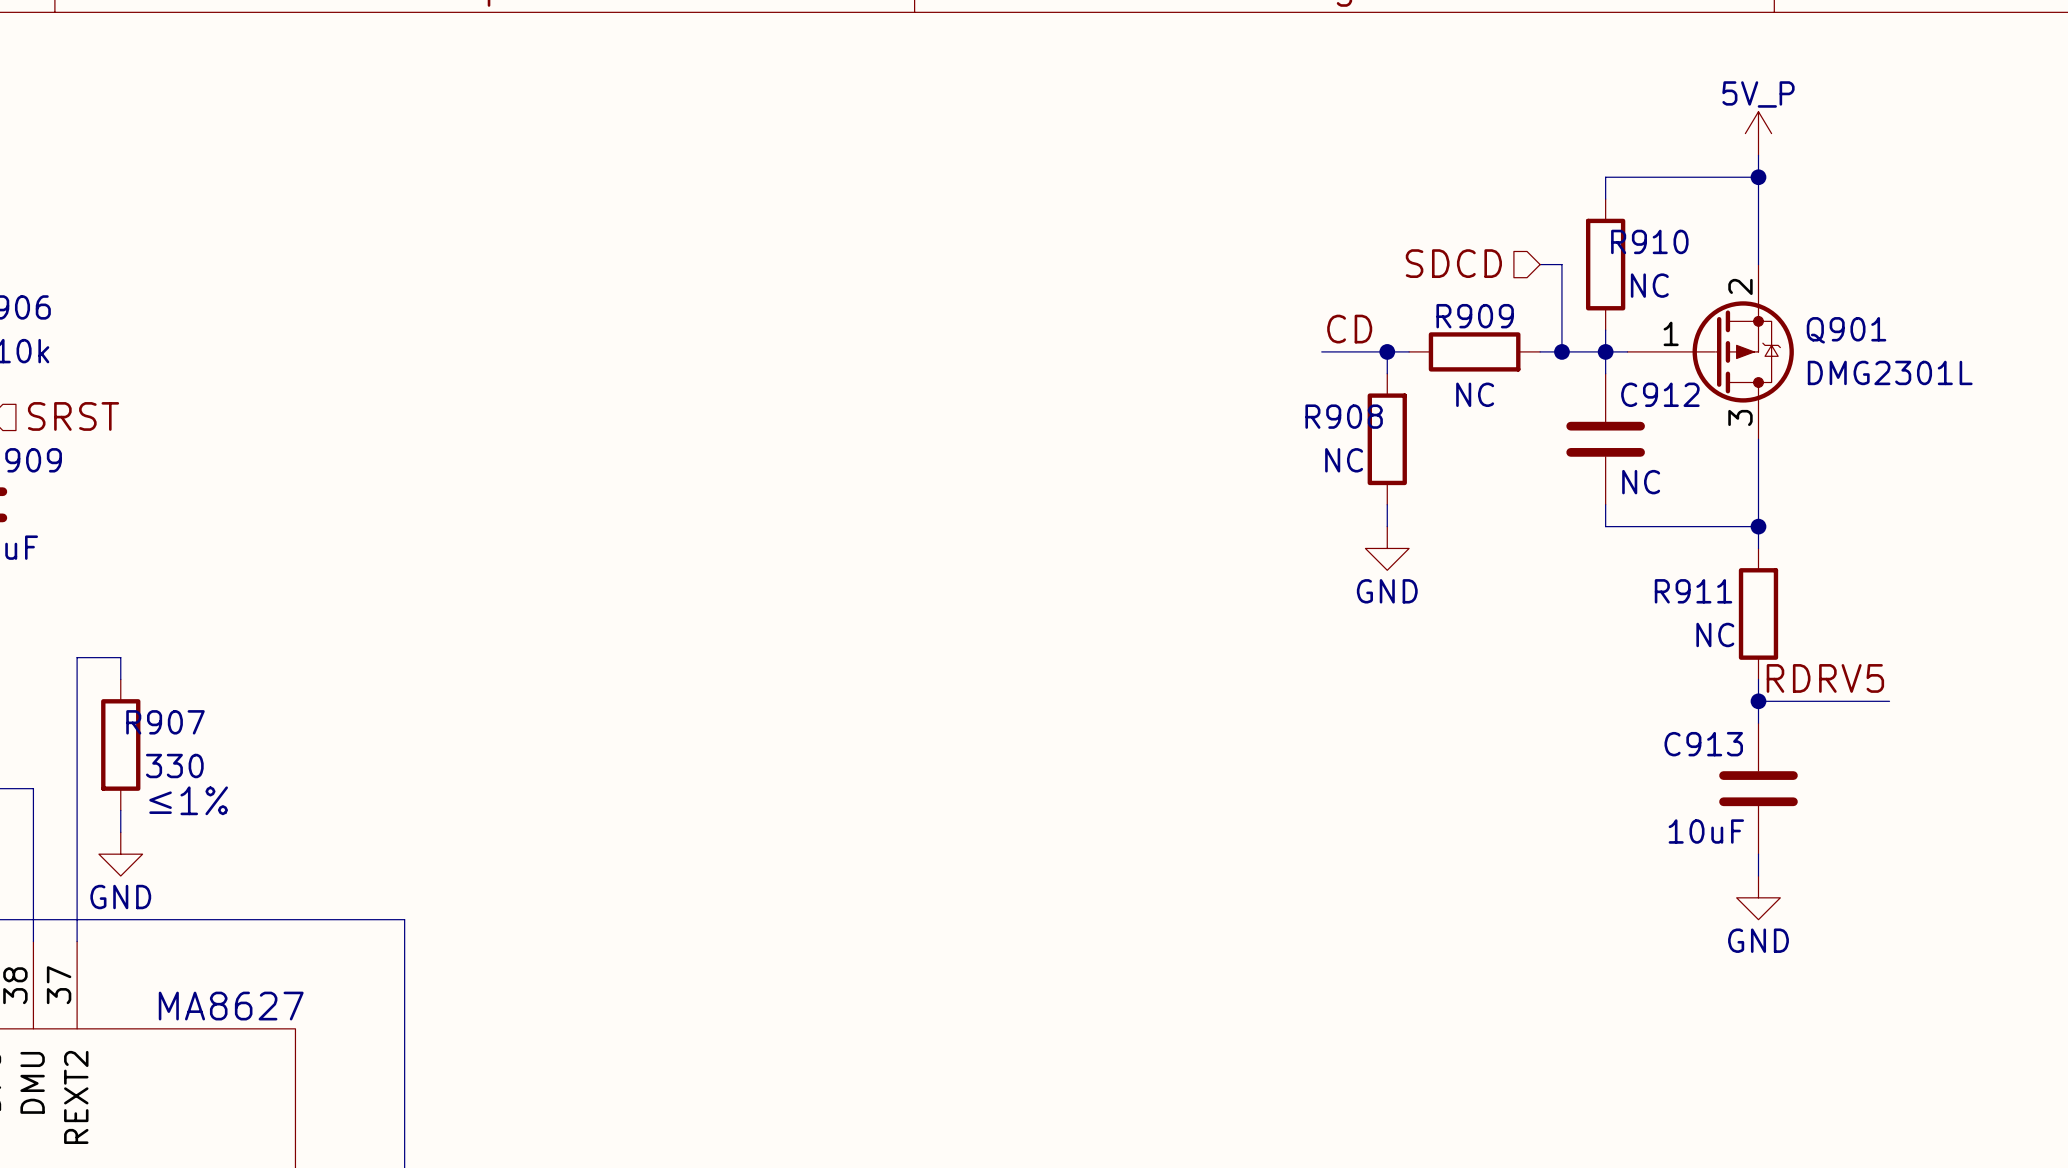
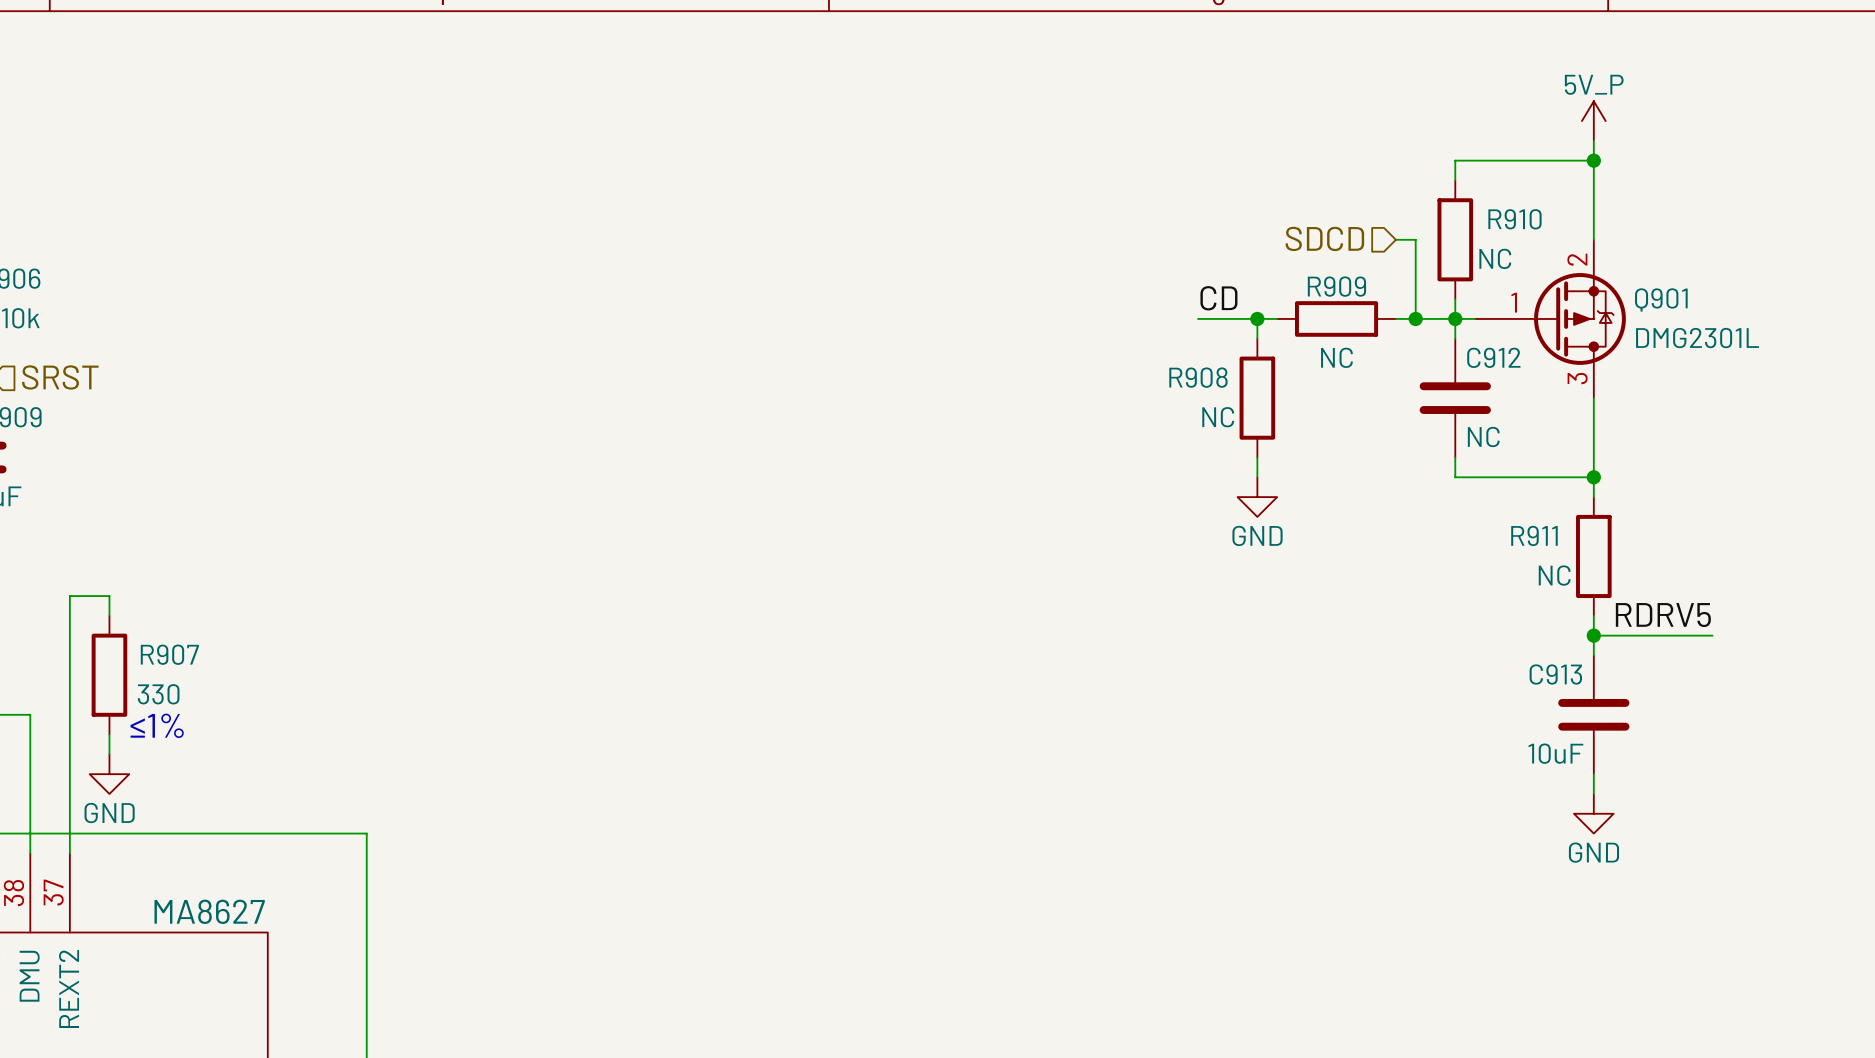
R910 name position: R910 (1649, 241) -> R910 (1514, 219)
R908 name position: R908 (1344, 416) -> R908 (1198, 377)
R907 name position: R907 (165, 722) -> R907 (169, 654)

